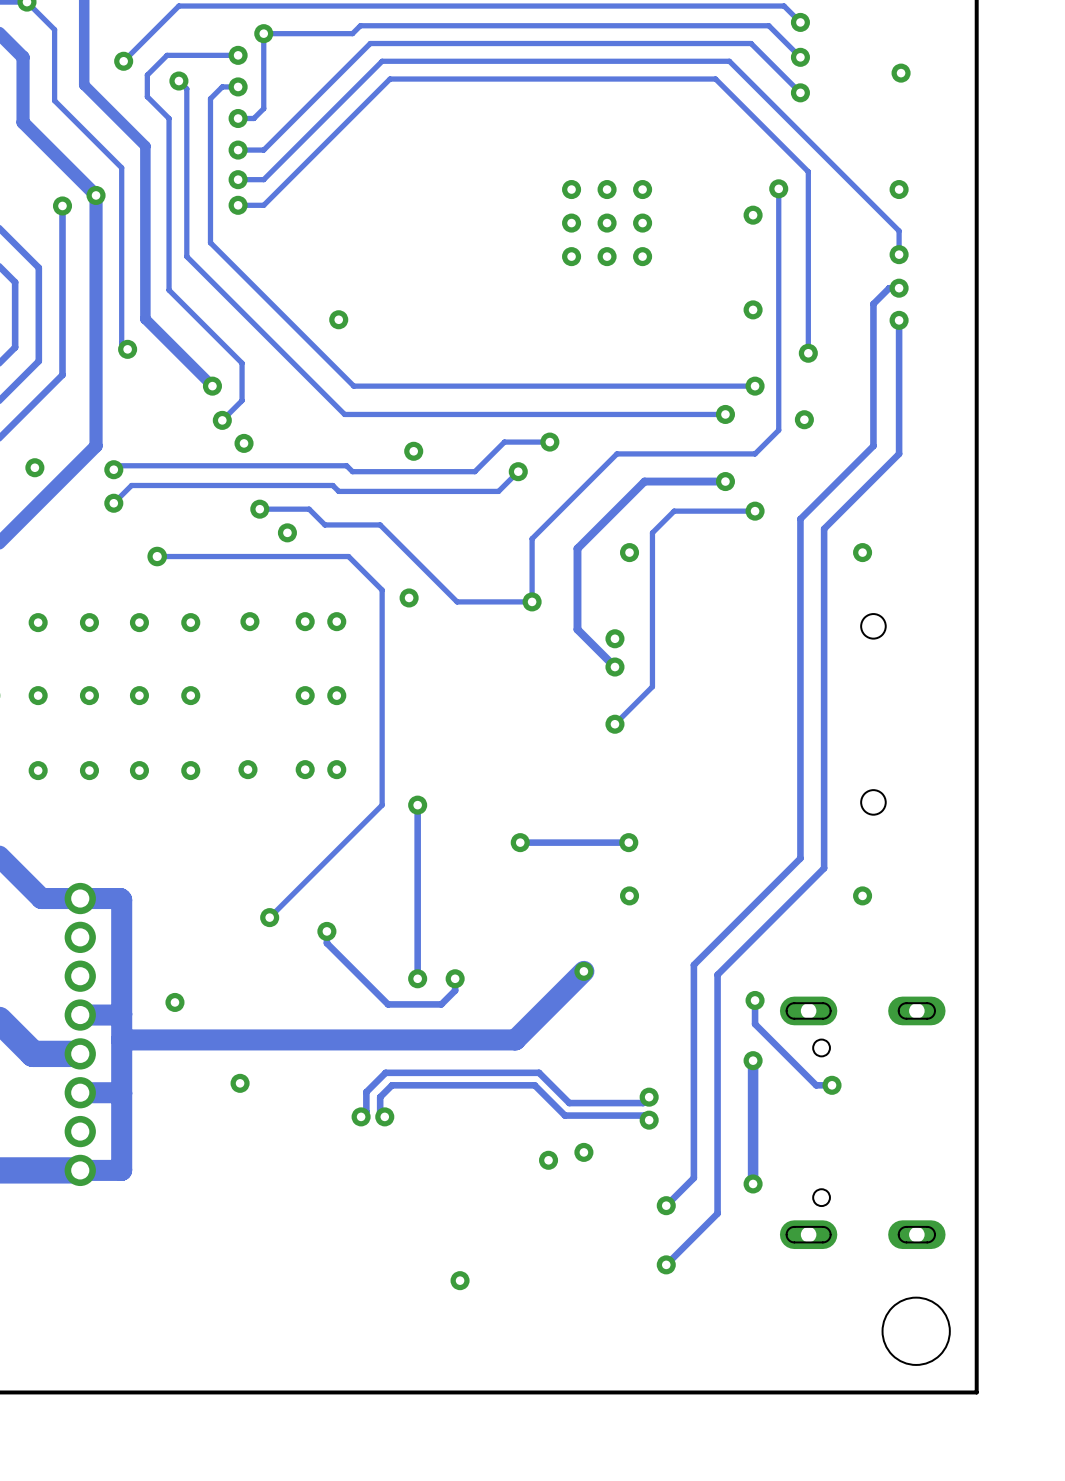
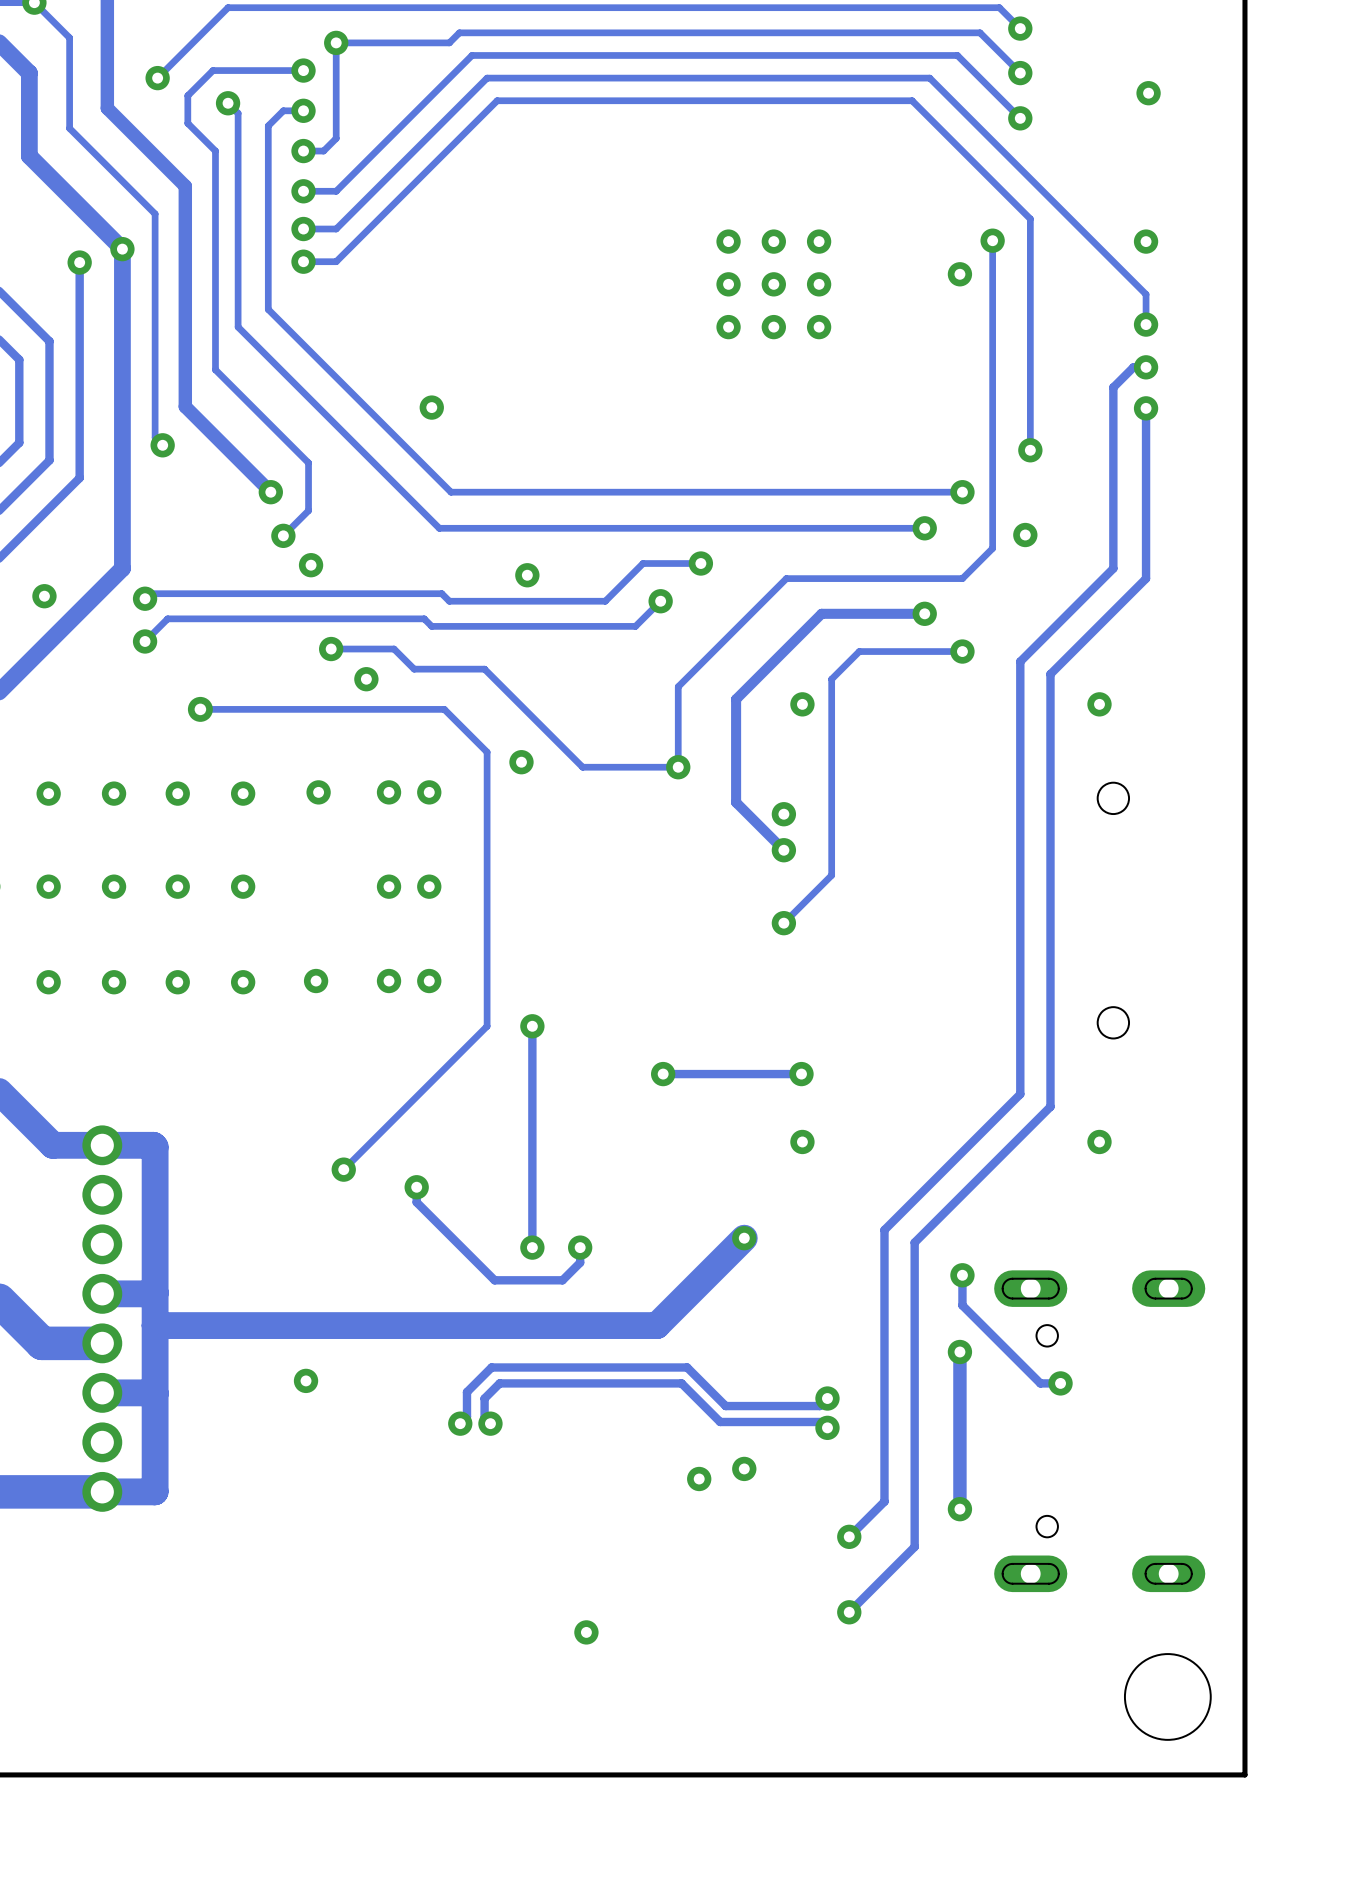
via: (753, 309) -> none
via: (174, 1002) -> none

